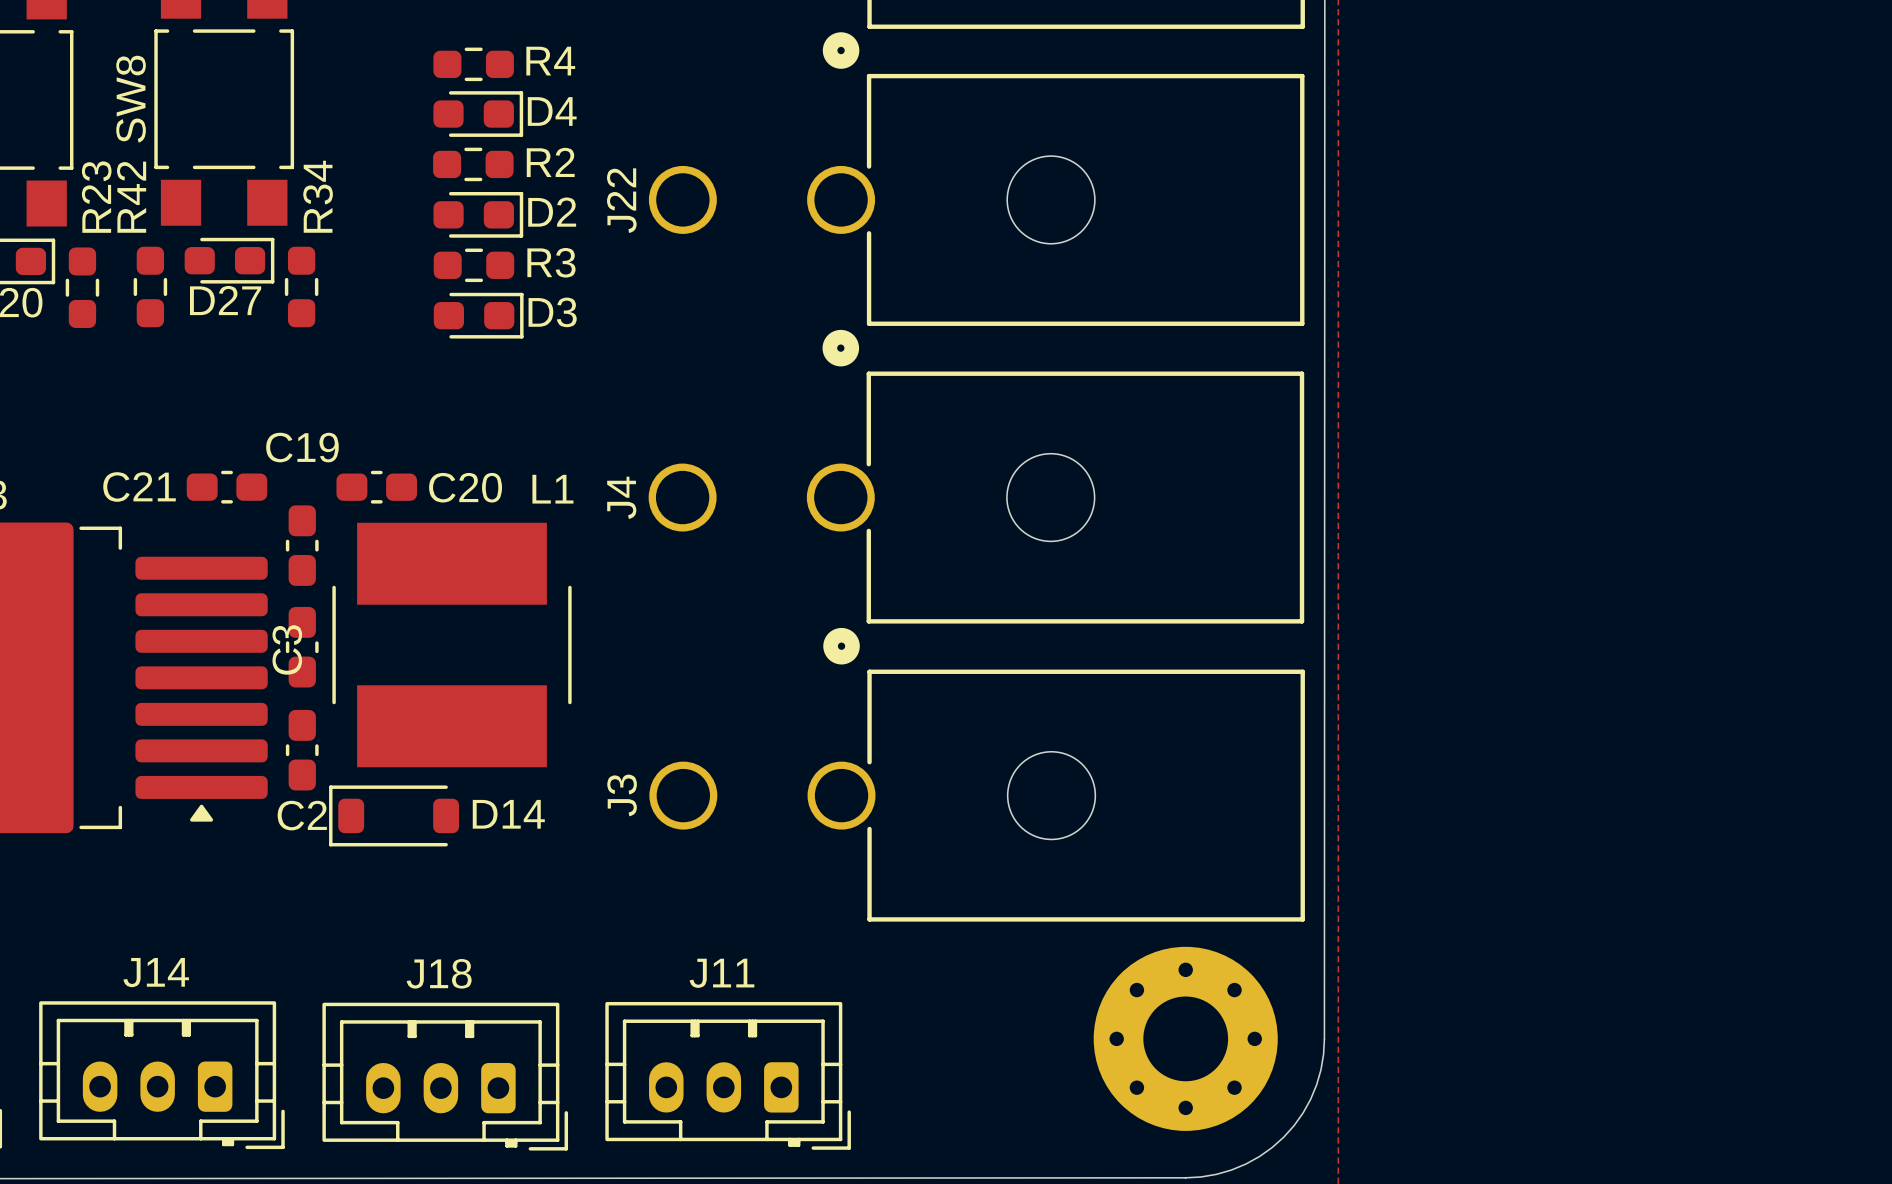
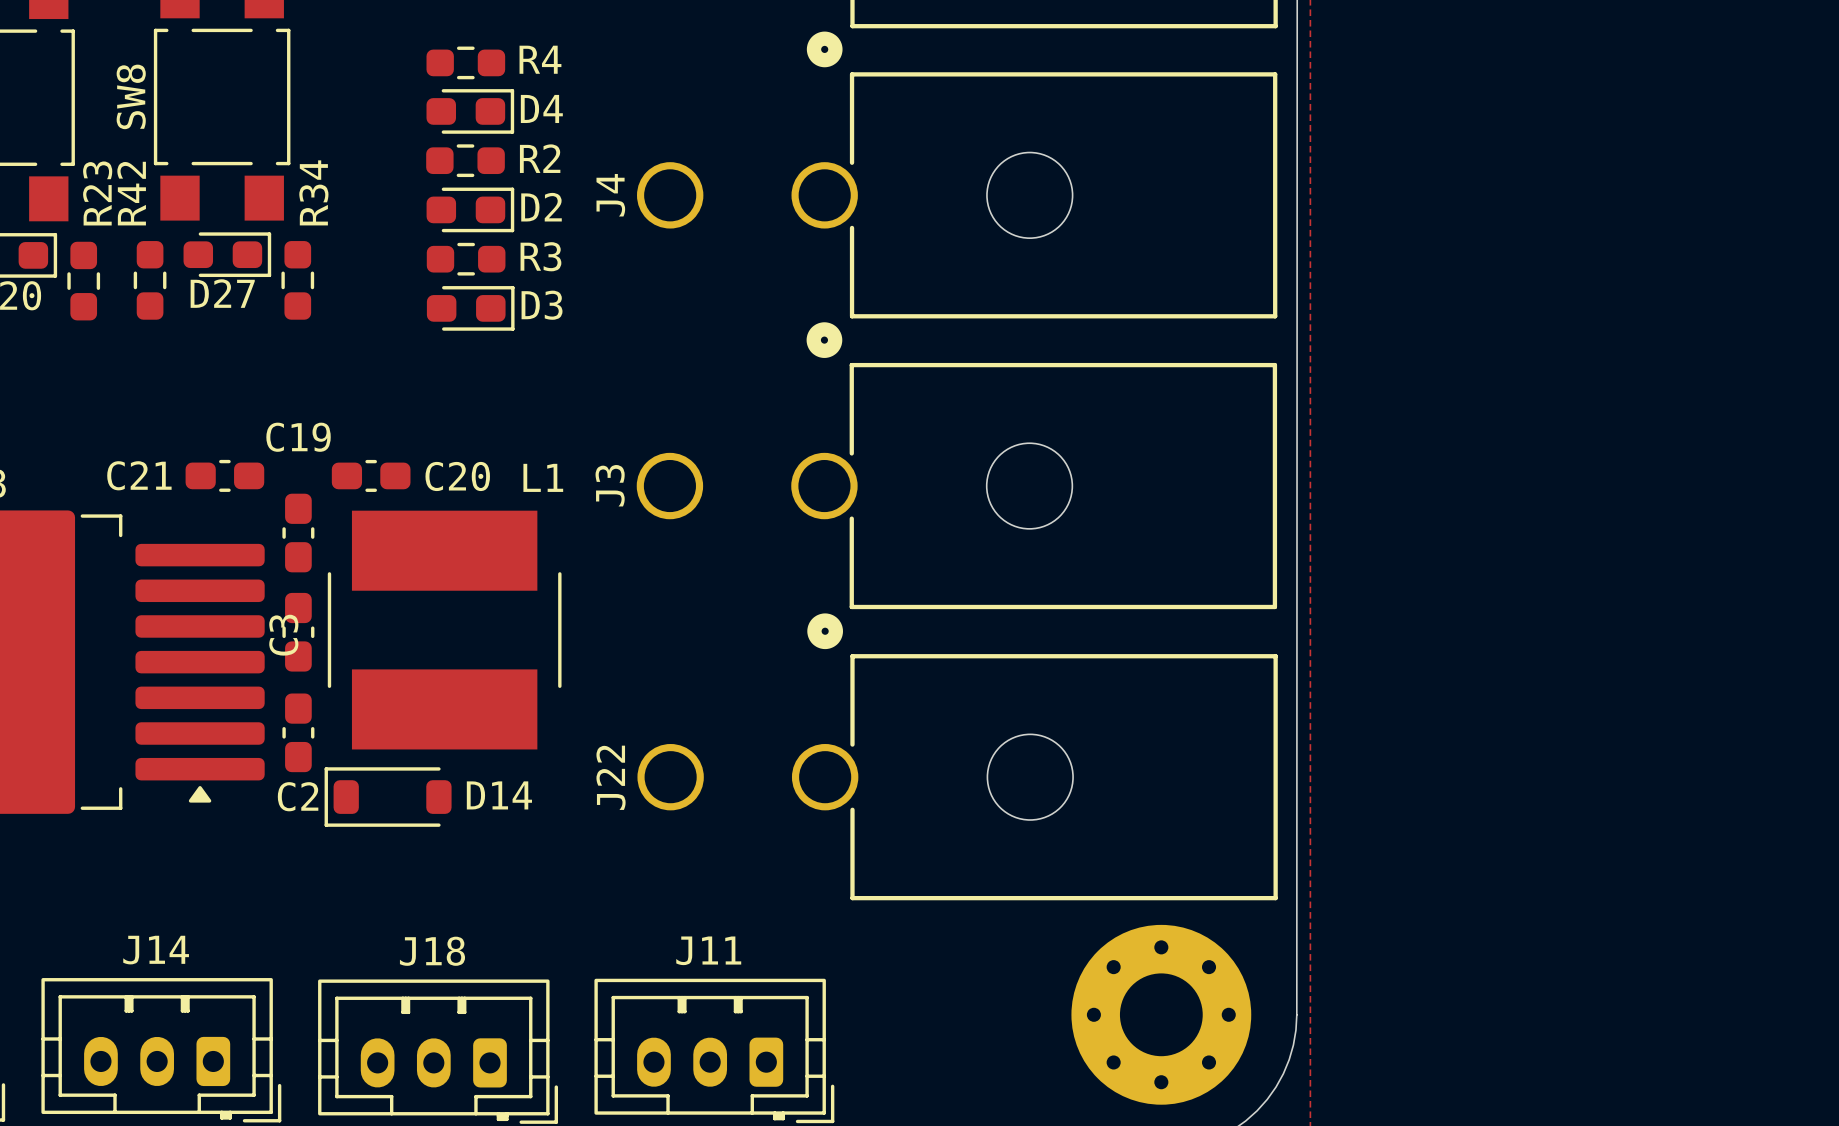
J22 name: J22 (621, 200) -> J4 (610, 195)
J4 name: J4 (621, 497) -> J3 (610, 485)
J3 name: J3 (622, 795) -> J22 (611, 777)

